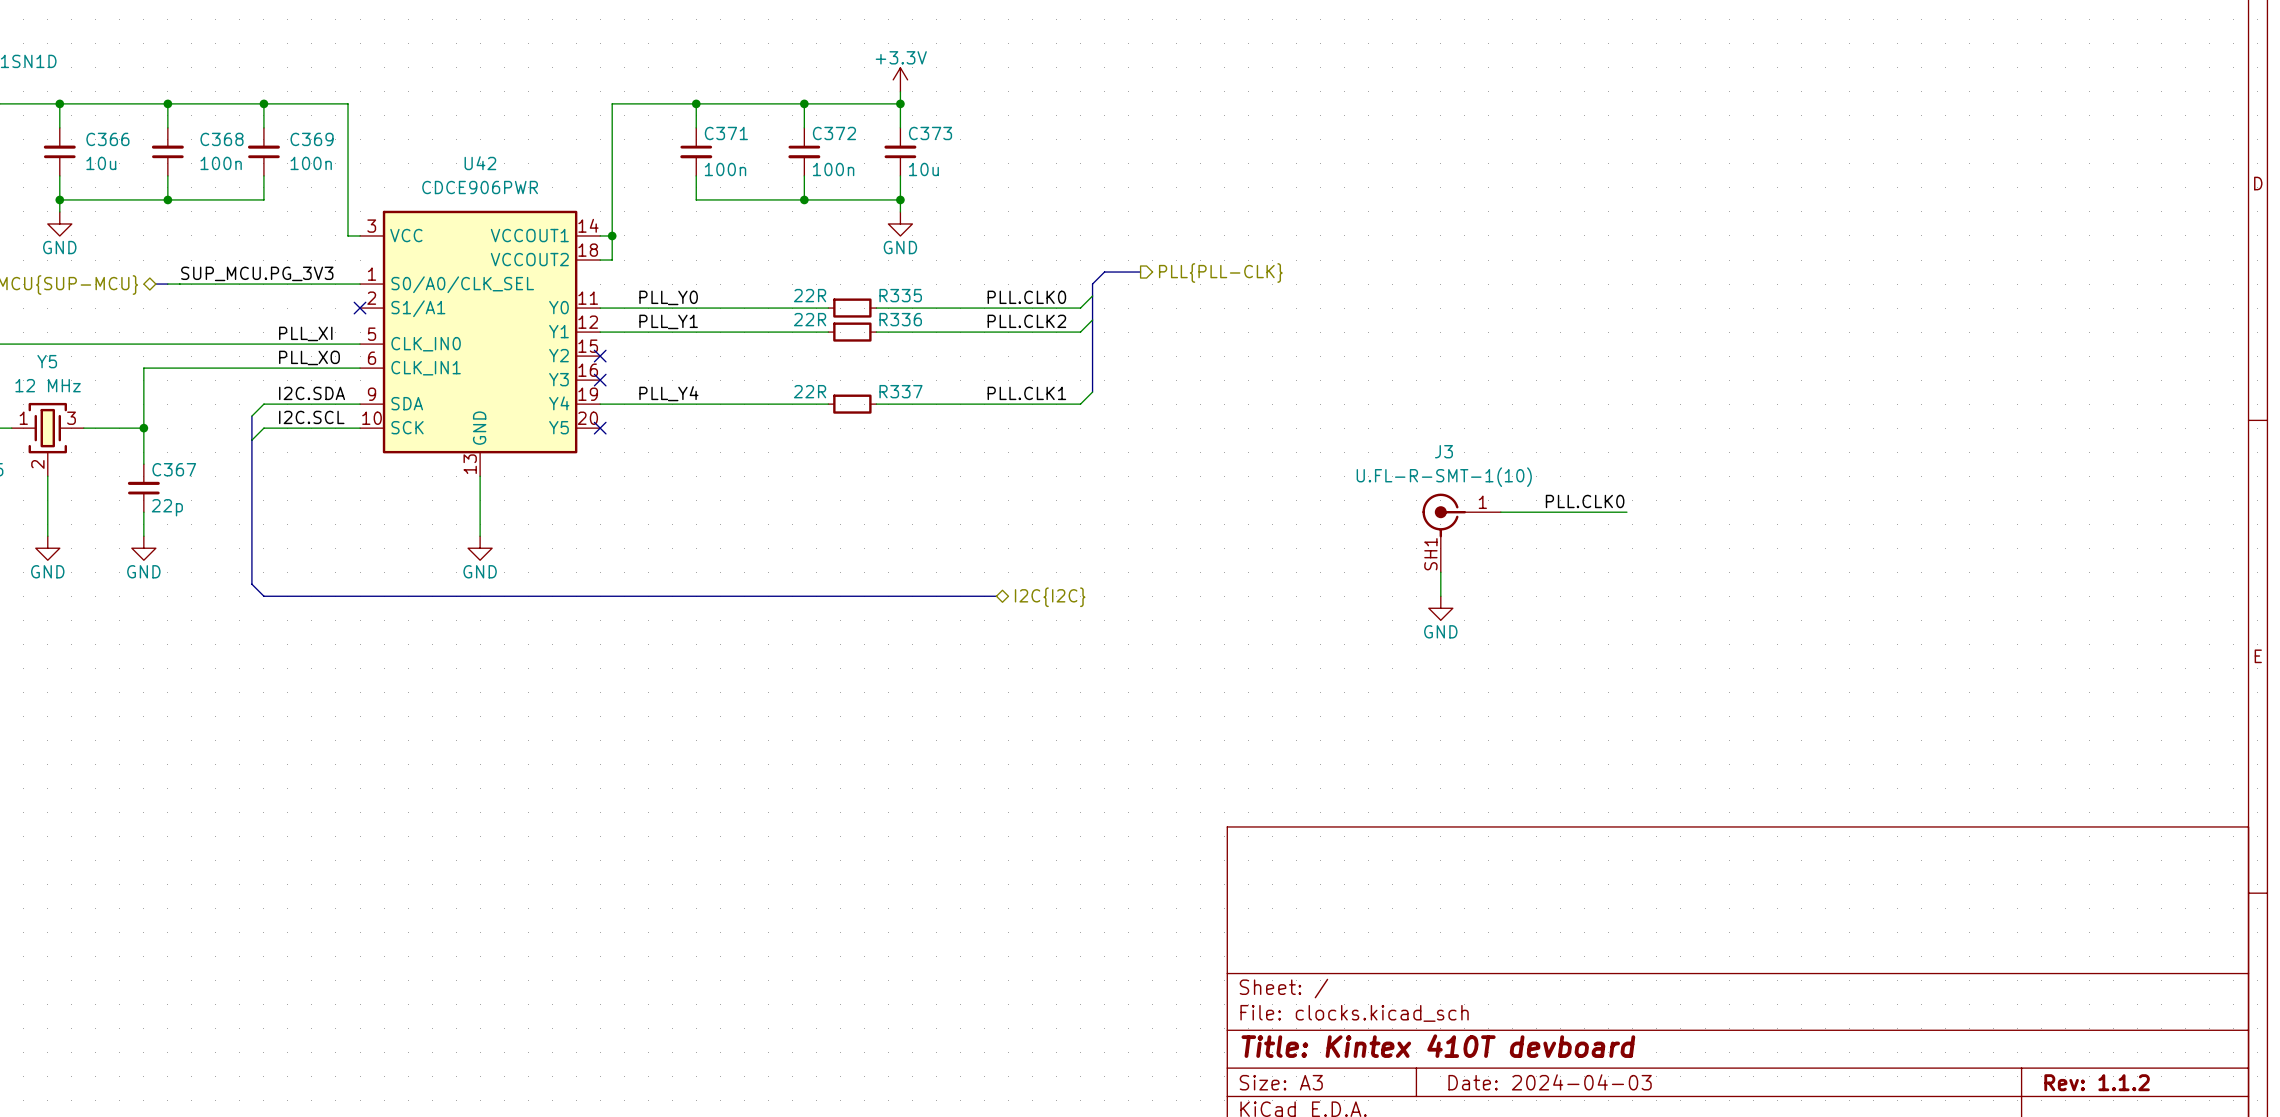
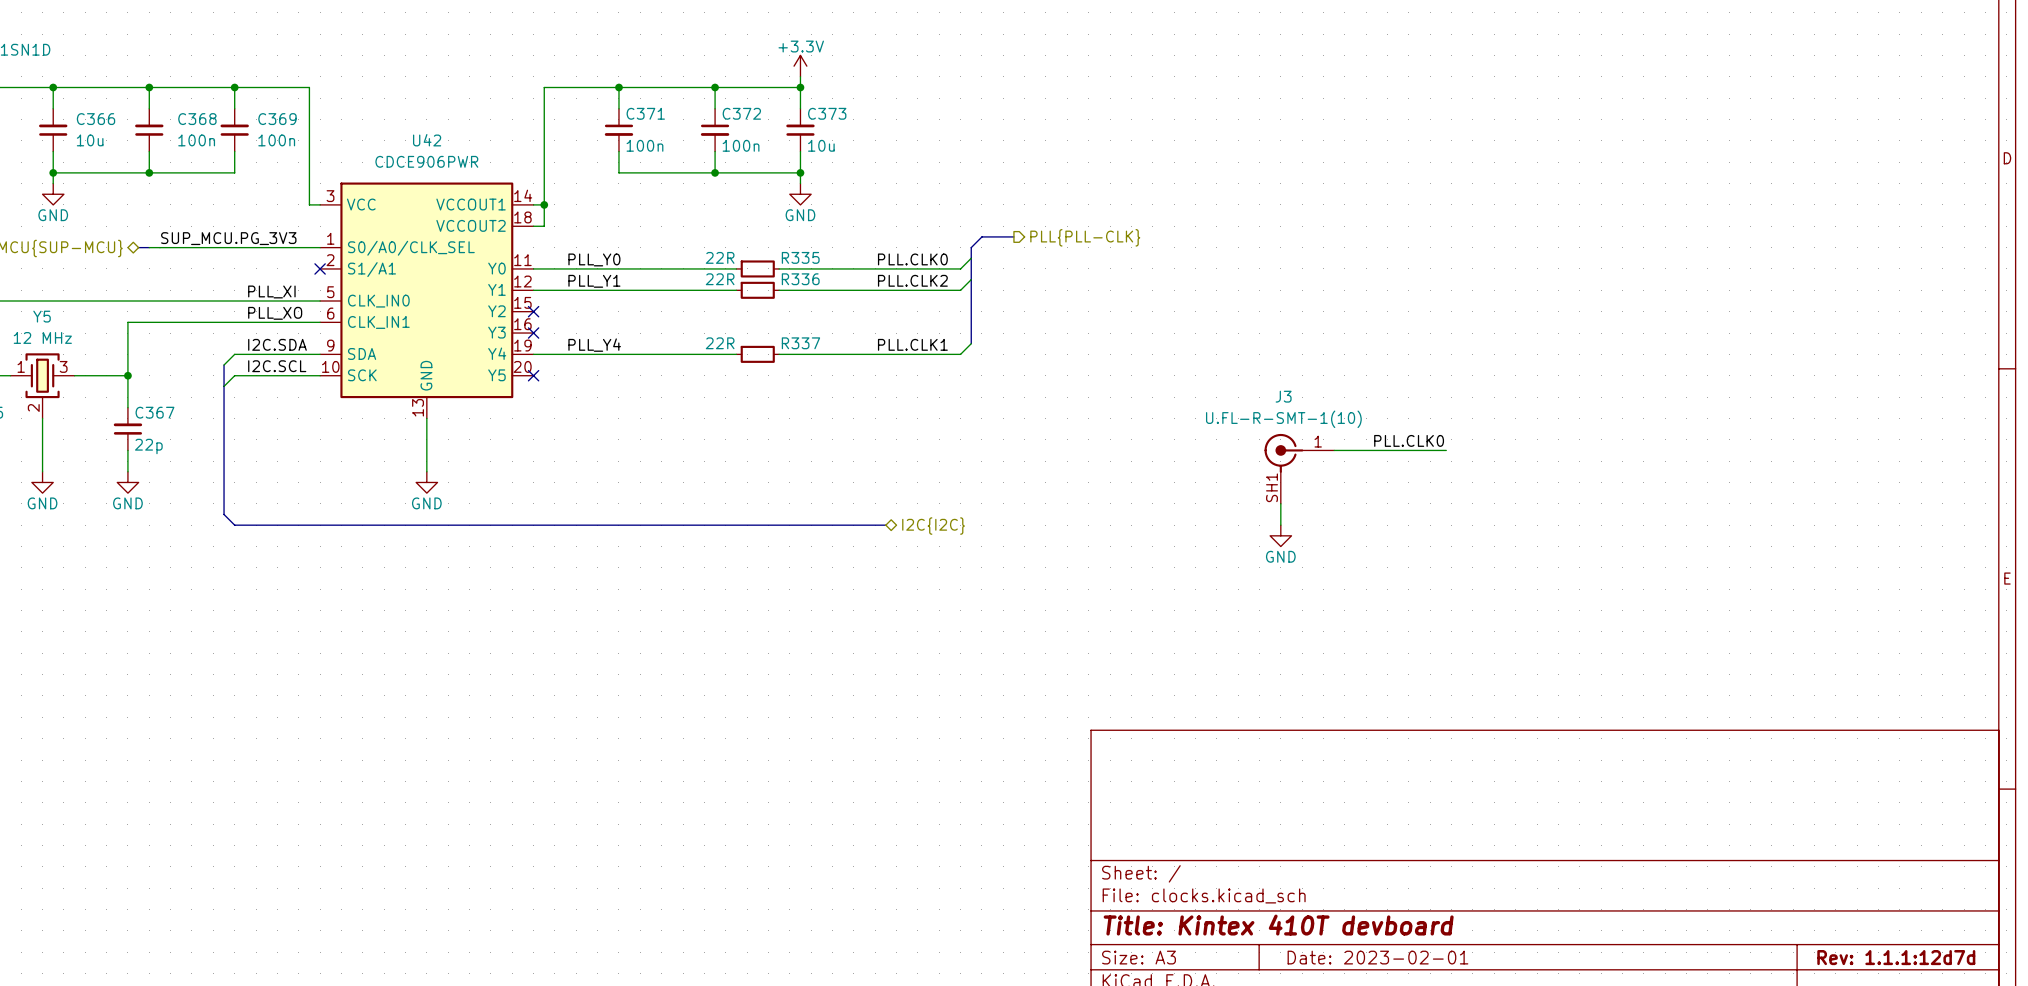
title block: Date: 2024-04-03 (1550, 1082) -> Date: 2023-02-01 (1377, 957)
title block: Rev: 1.1.2 (2097, 1082) -> Rev: 1.1.1:12d7d (1896, 957)

